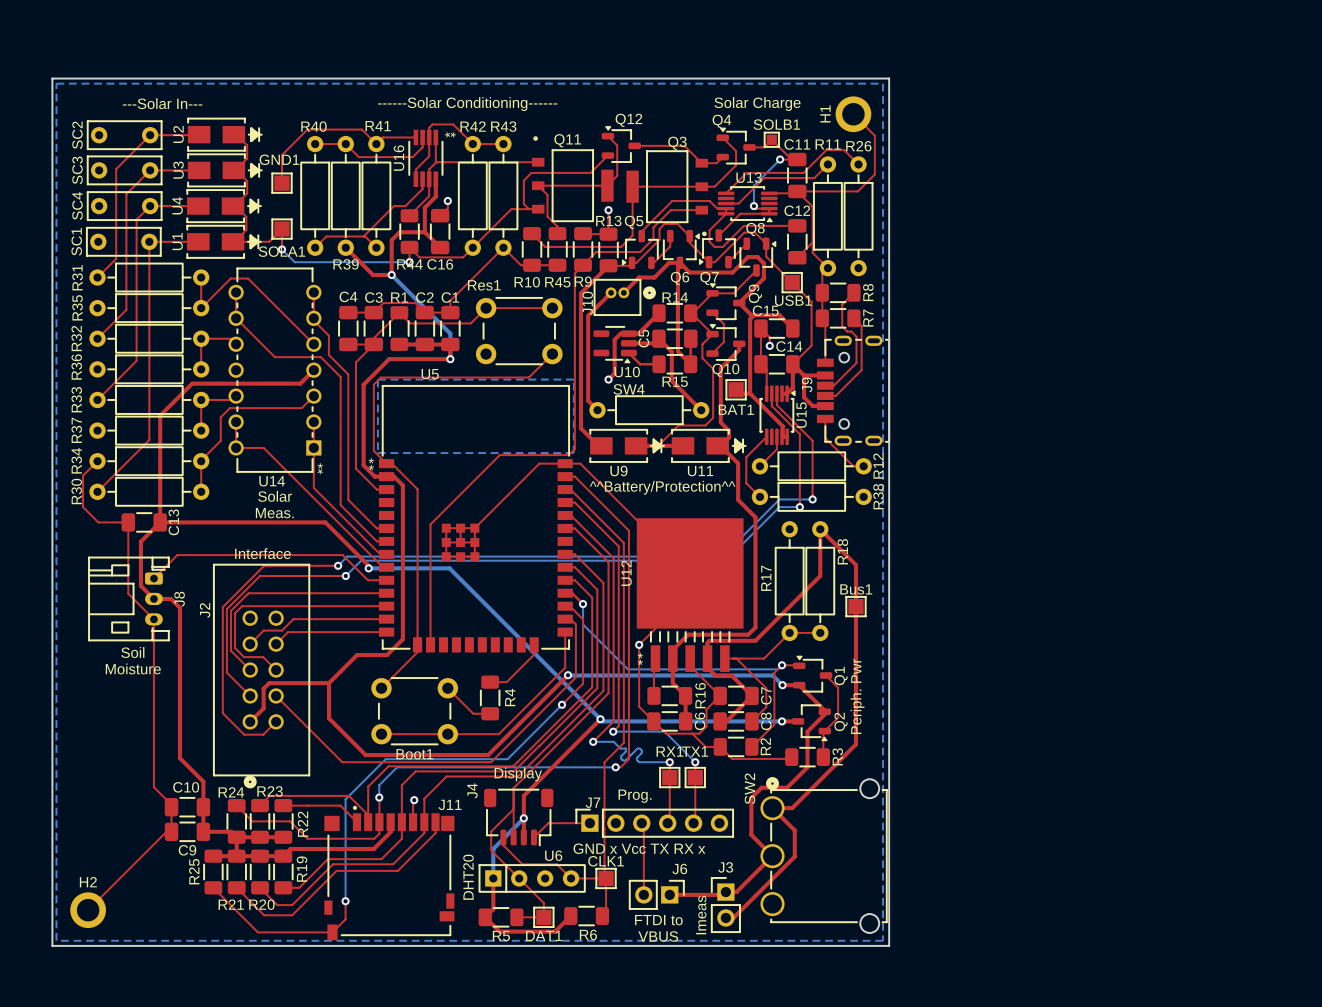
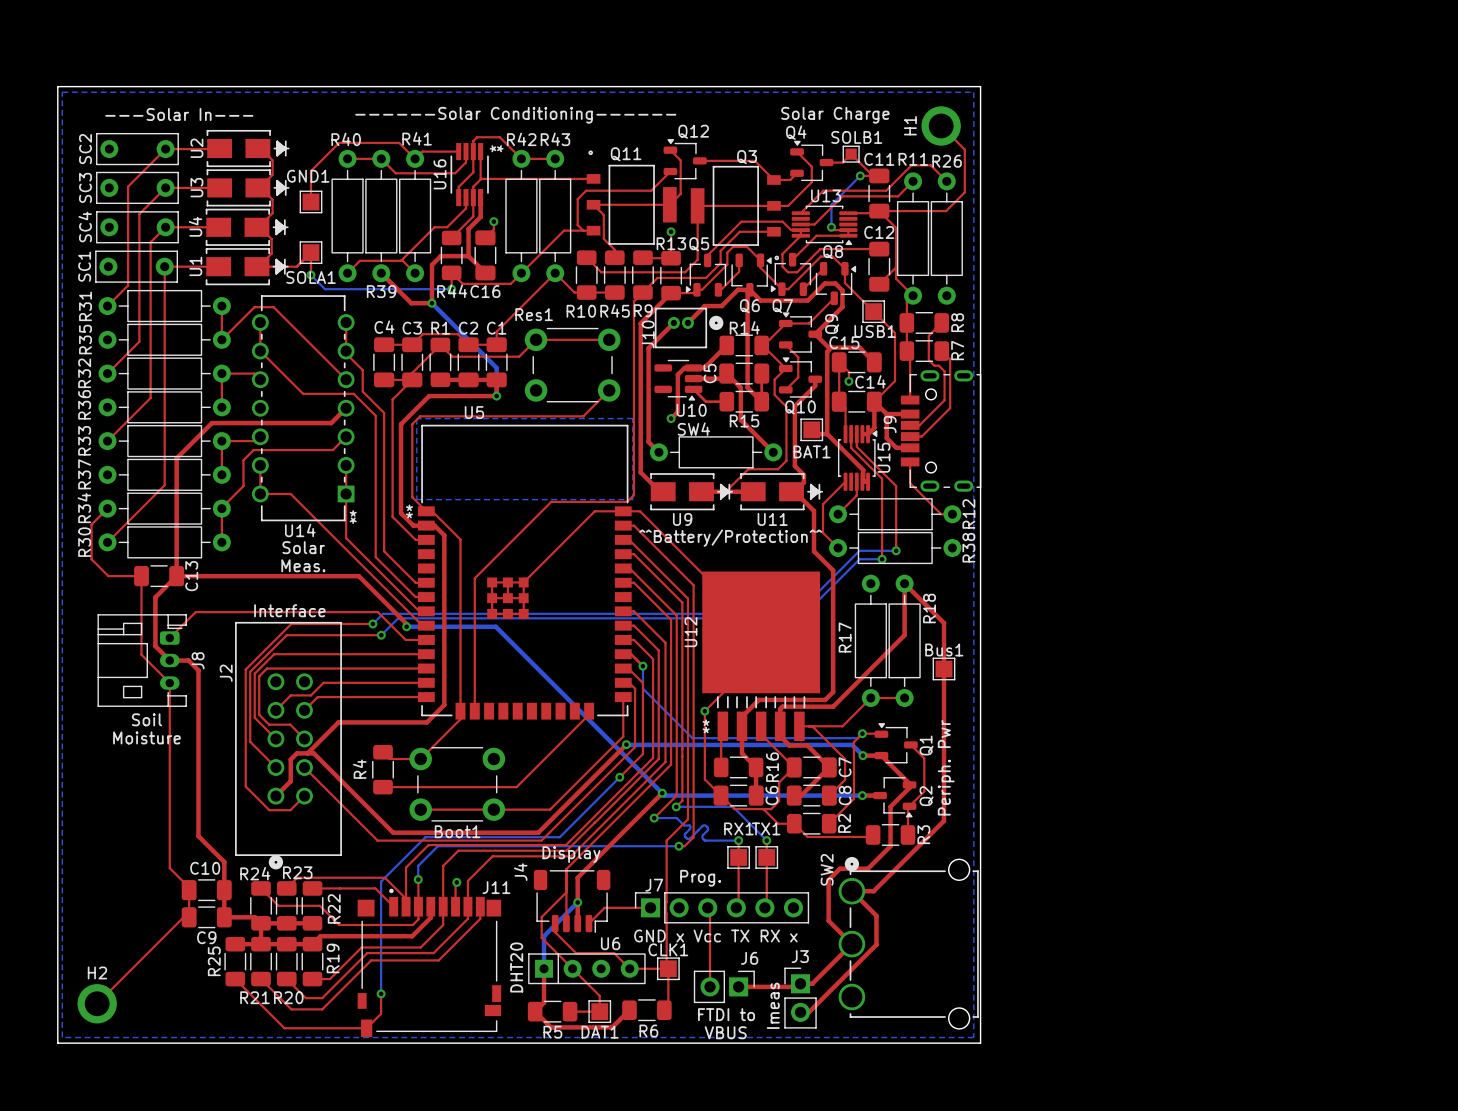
top track: (534, 647) (534, 654) (506, 682) (490, 682) -> (589, 714) (516, 787) (383, 787)
top track: (357, 655) (329, 683) -> (393, 722) (338, 722) (307, 753)
top track: none -> (383, 752) (389, 759) (420, 759)
top track: (284, 683) (329, 683) -> none
top track: (329, 683) (329, 718) (365, 755) -> (313, 753) (393, 832) (403, 832)
top track: (447, 688) (473, 713) (490, 713) -> none
R4 position: (490, 697) -> (383, 769)
R4 name position: R4 (510, 697) -> R4 (359, 769)

